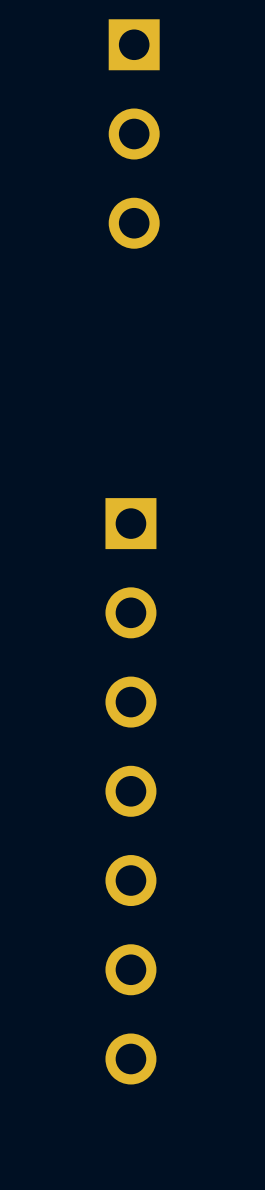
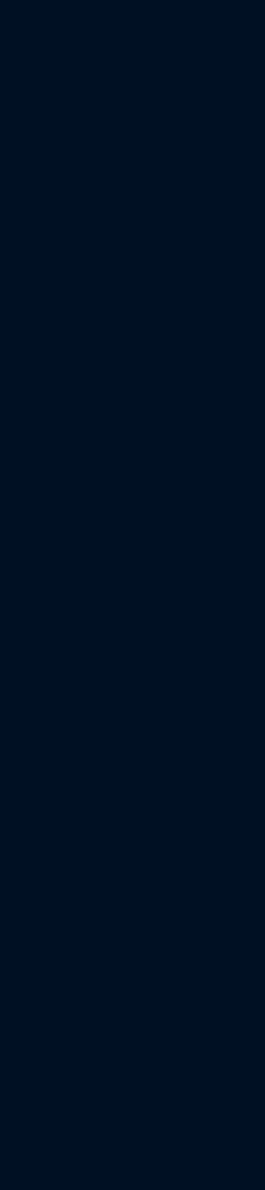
part: (134, 134) -> none
part: (130, 791) -> none

